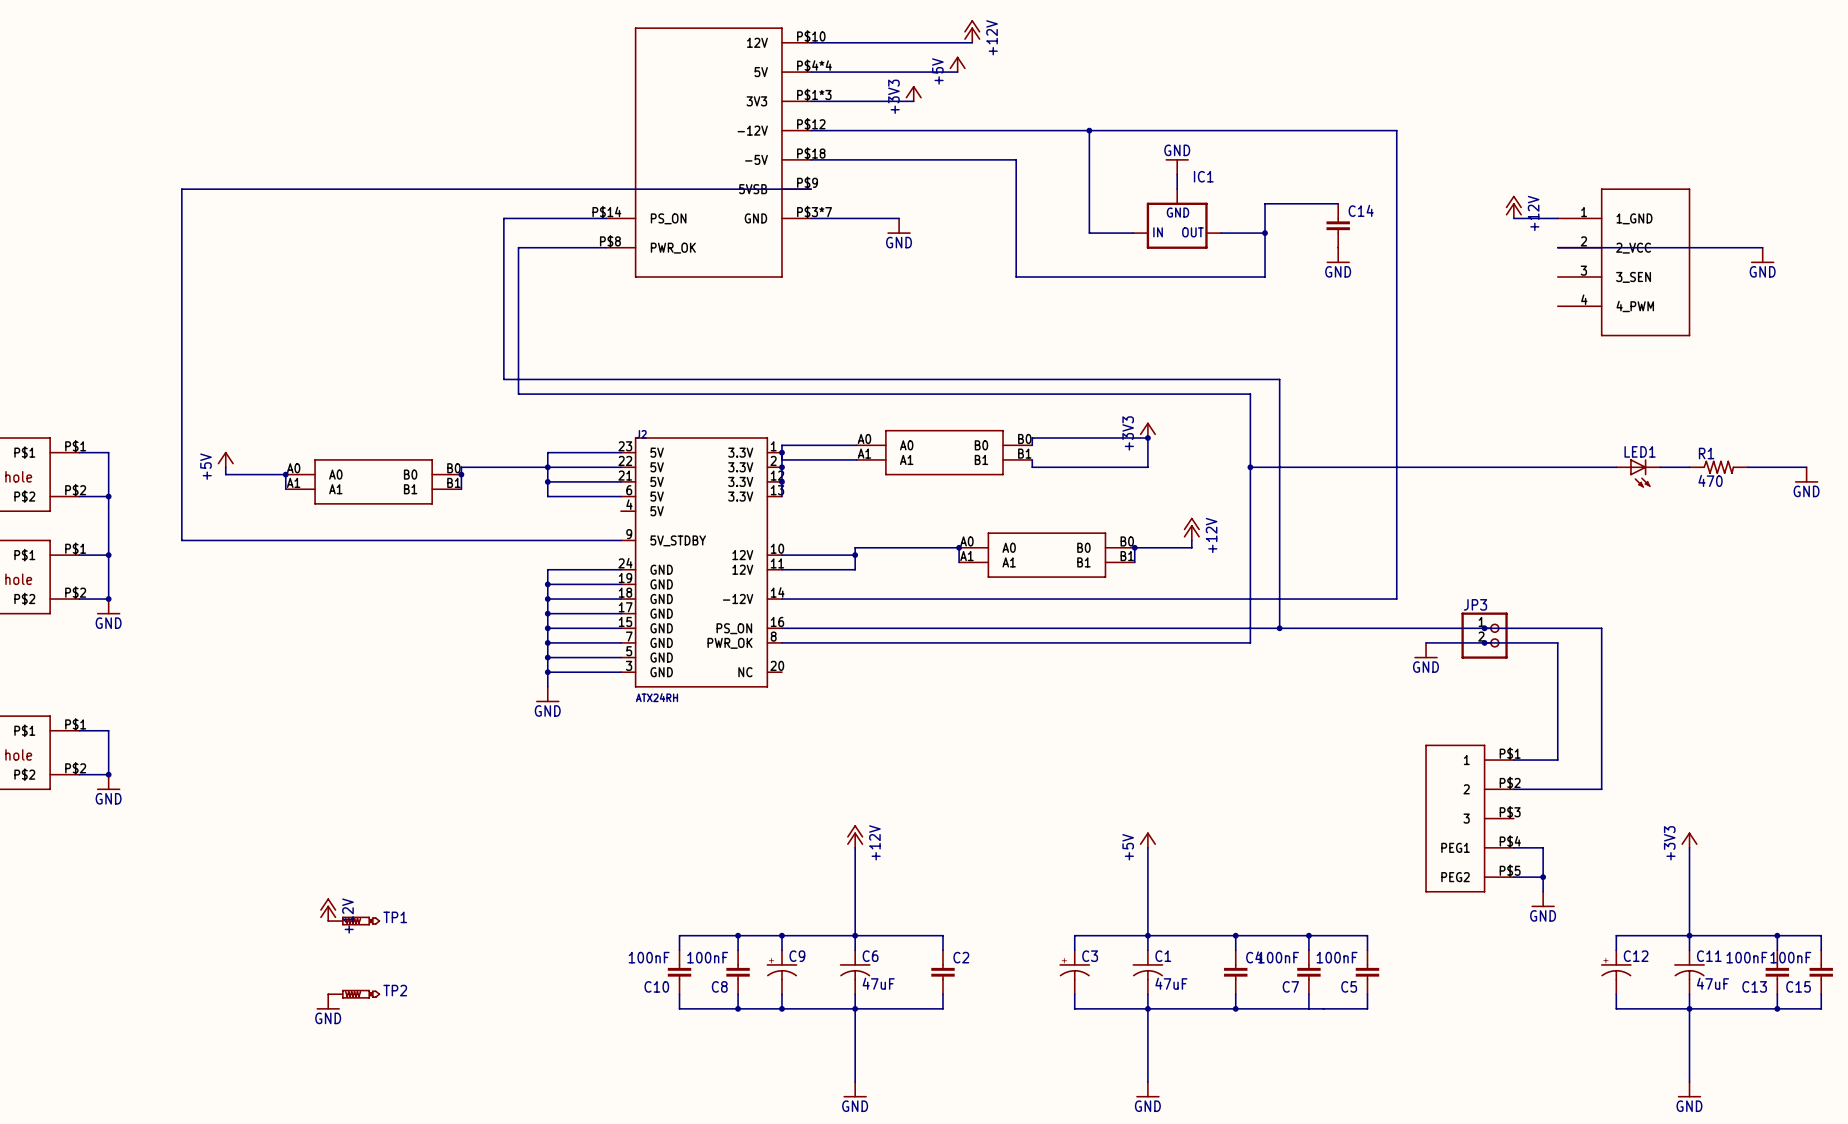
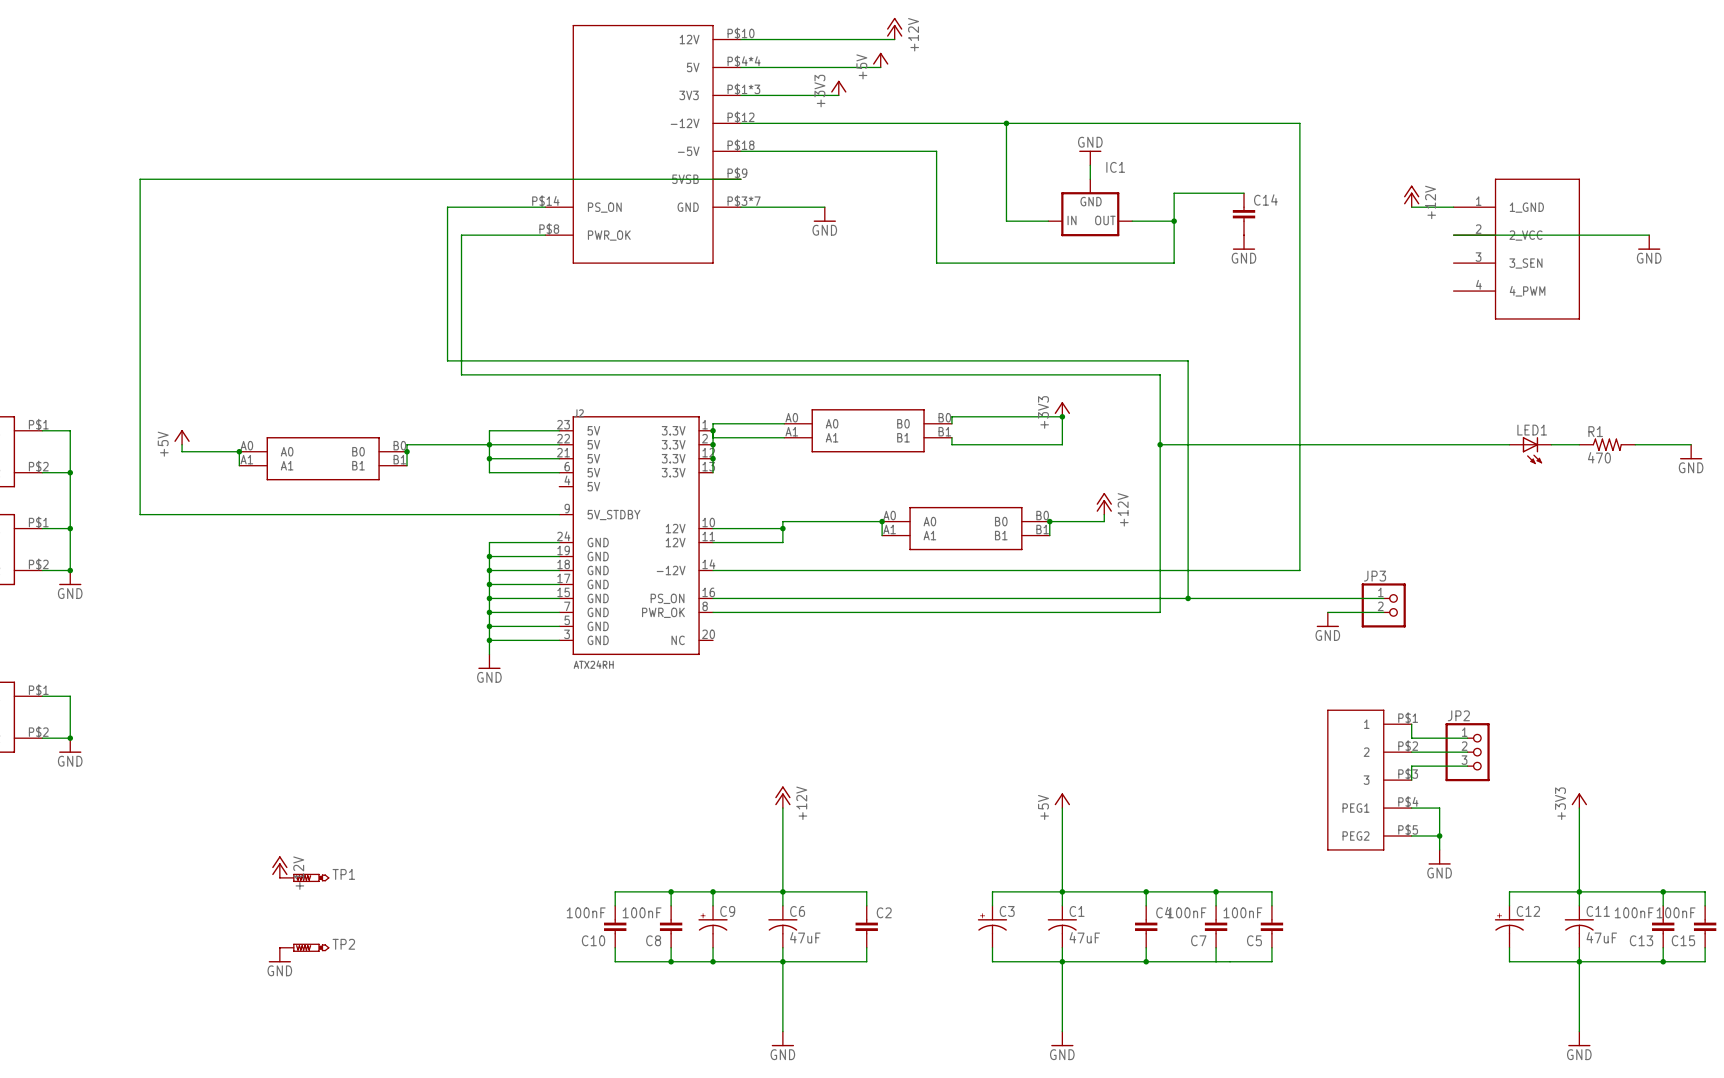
wire: (1484, 628) (1601, 628) (1601, 789) (1572, 789) -> none
junction: (1484, 628) -> none
wire: (1484, 642) (1557, 642) (1557, 760) (1513, 760) -> (1467, 738) (1411, 738) (1411, 724)
junction: (1484, 642) -> none
JP2: none -> (1467, 752)
wire: none -> (1467, 766) (1411, 766) (1411, 780)

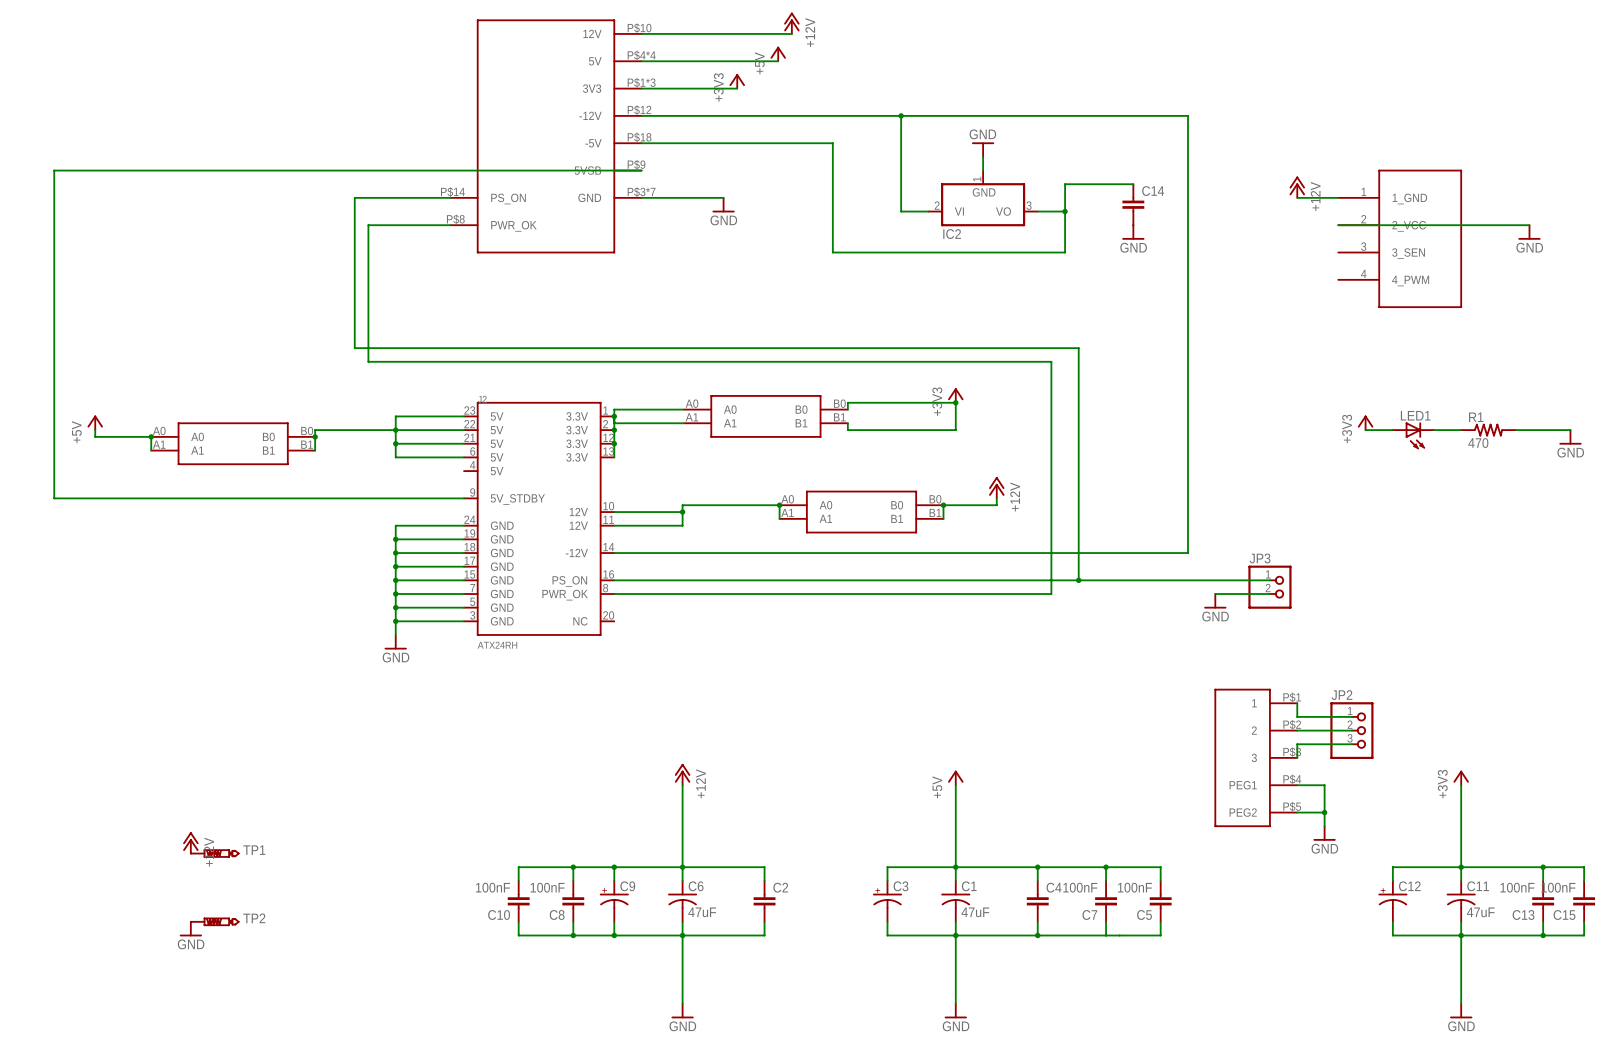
IC1: (1090, 207) -> none
IC2: none -> (983, 198)
power symbol: none -> +3V3 (1365, 422)
wire: (1160, 444) (1481, 444) -> none
junction: (1160, 444) -> none

